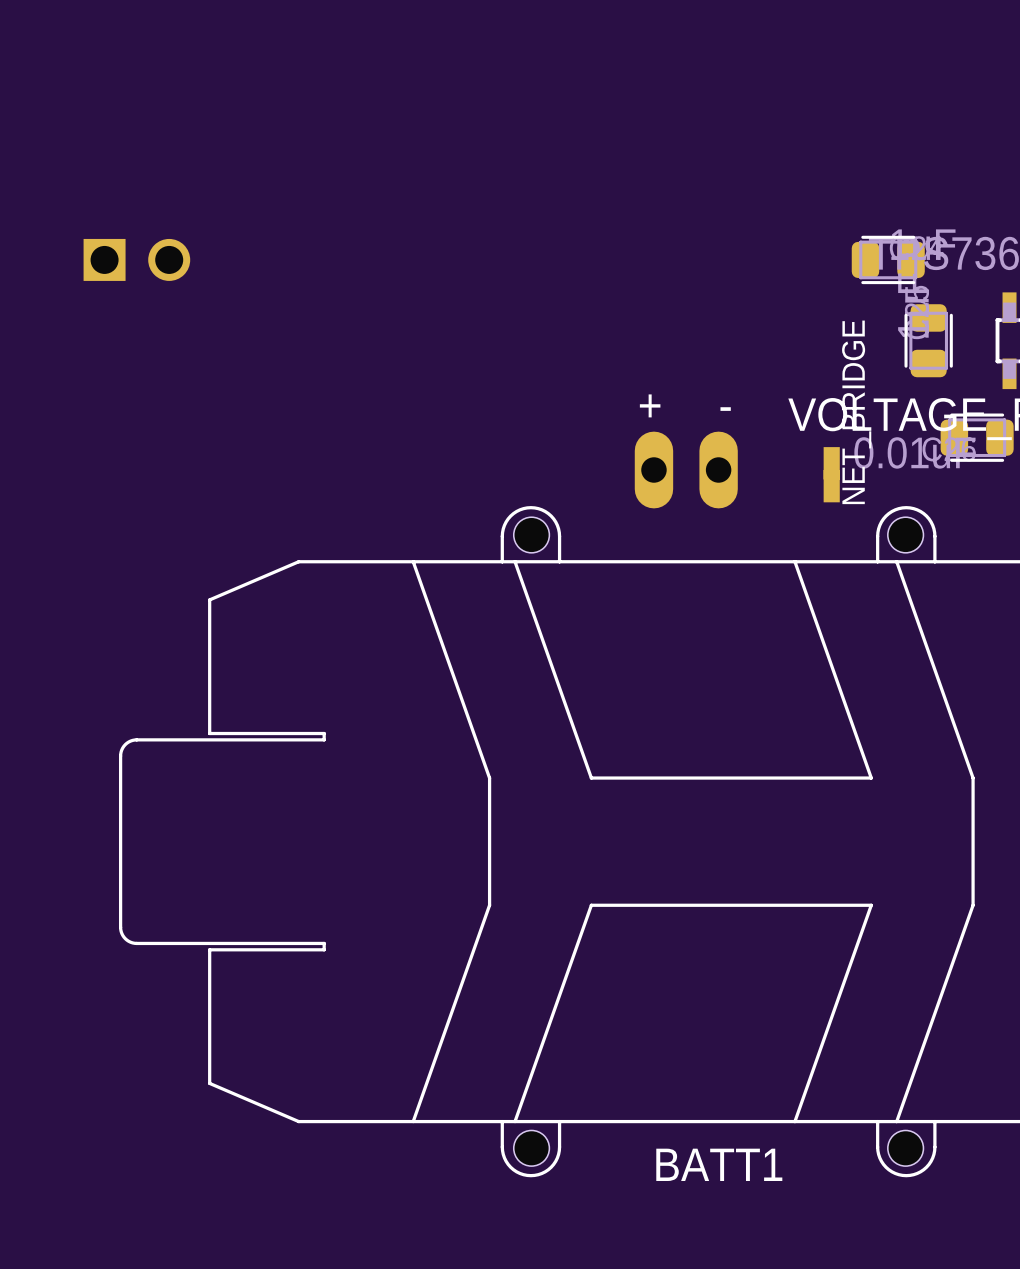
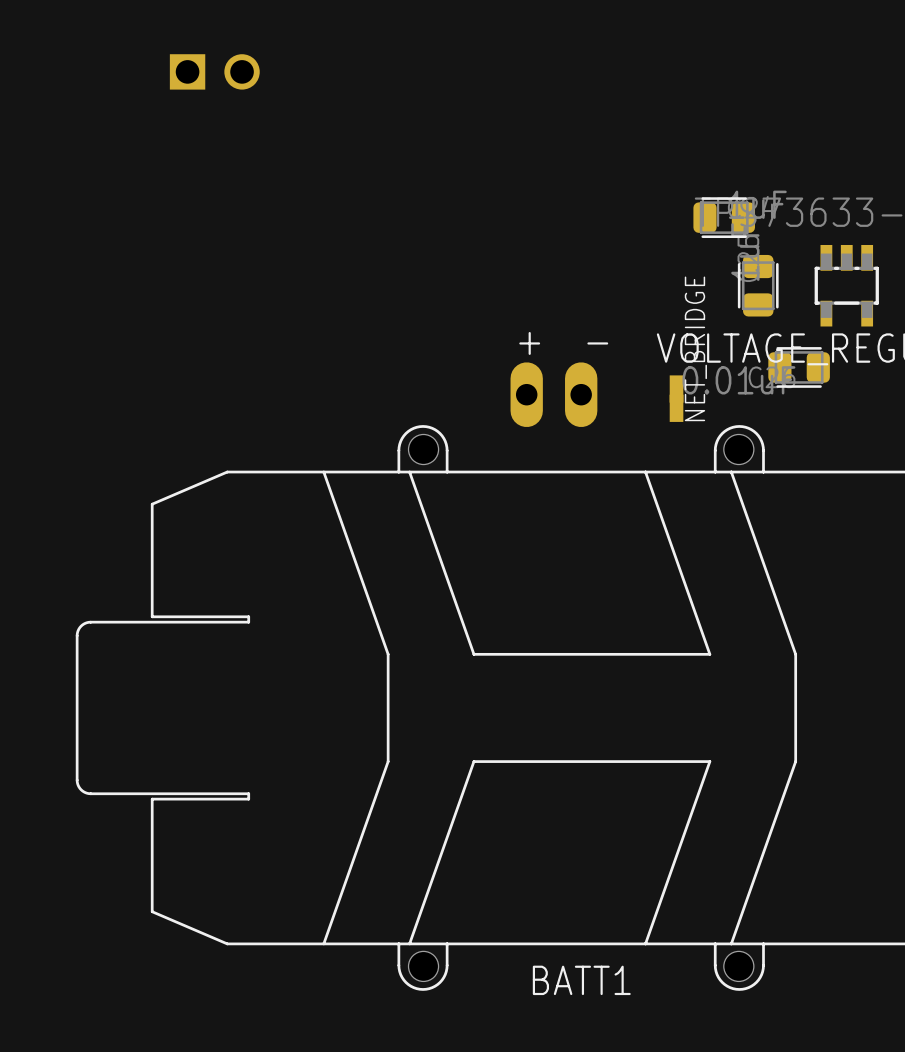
part position: (136, 259) -> (214, 71)

